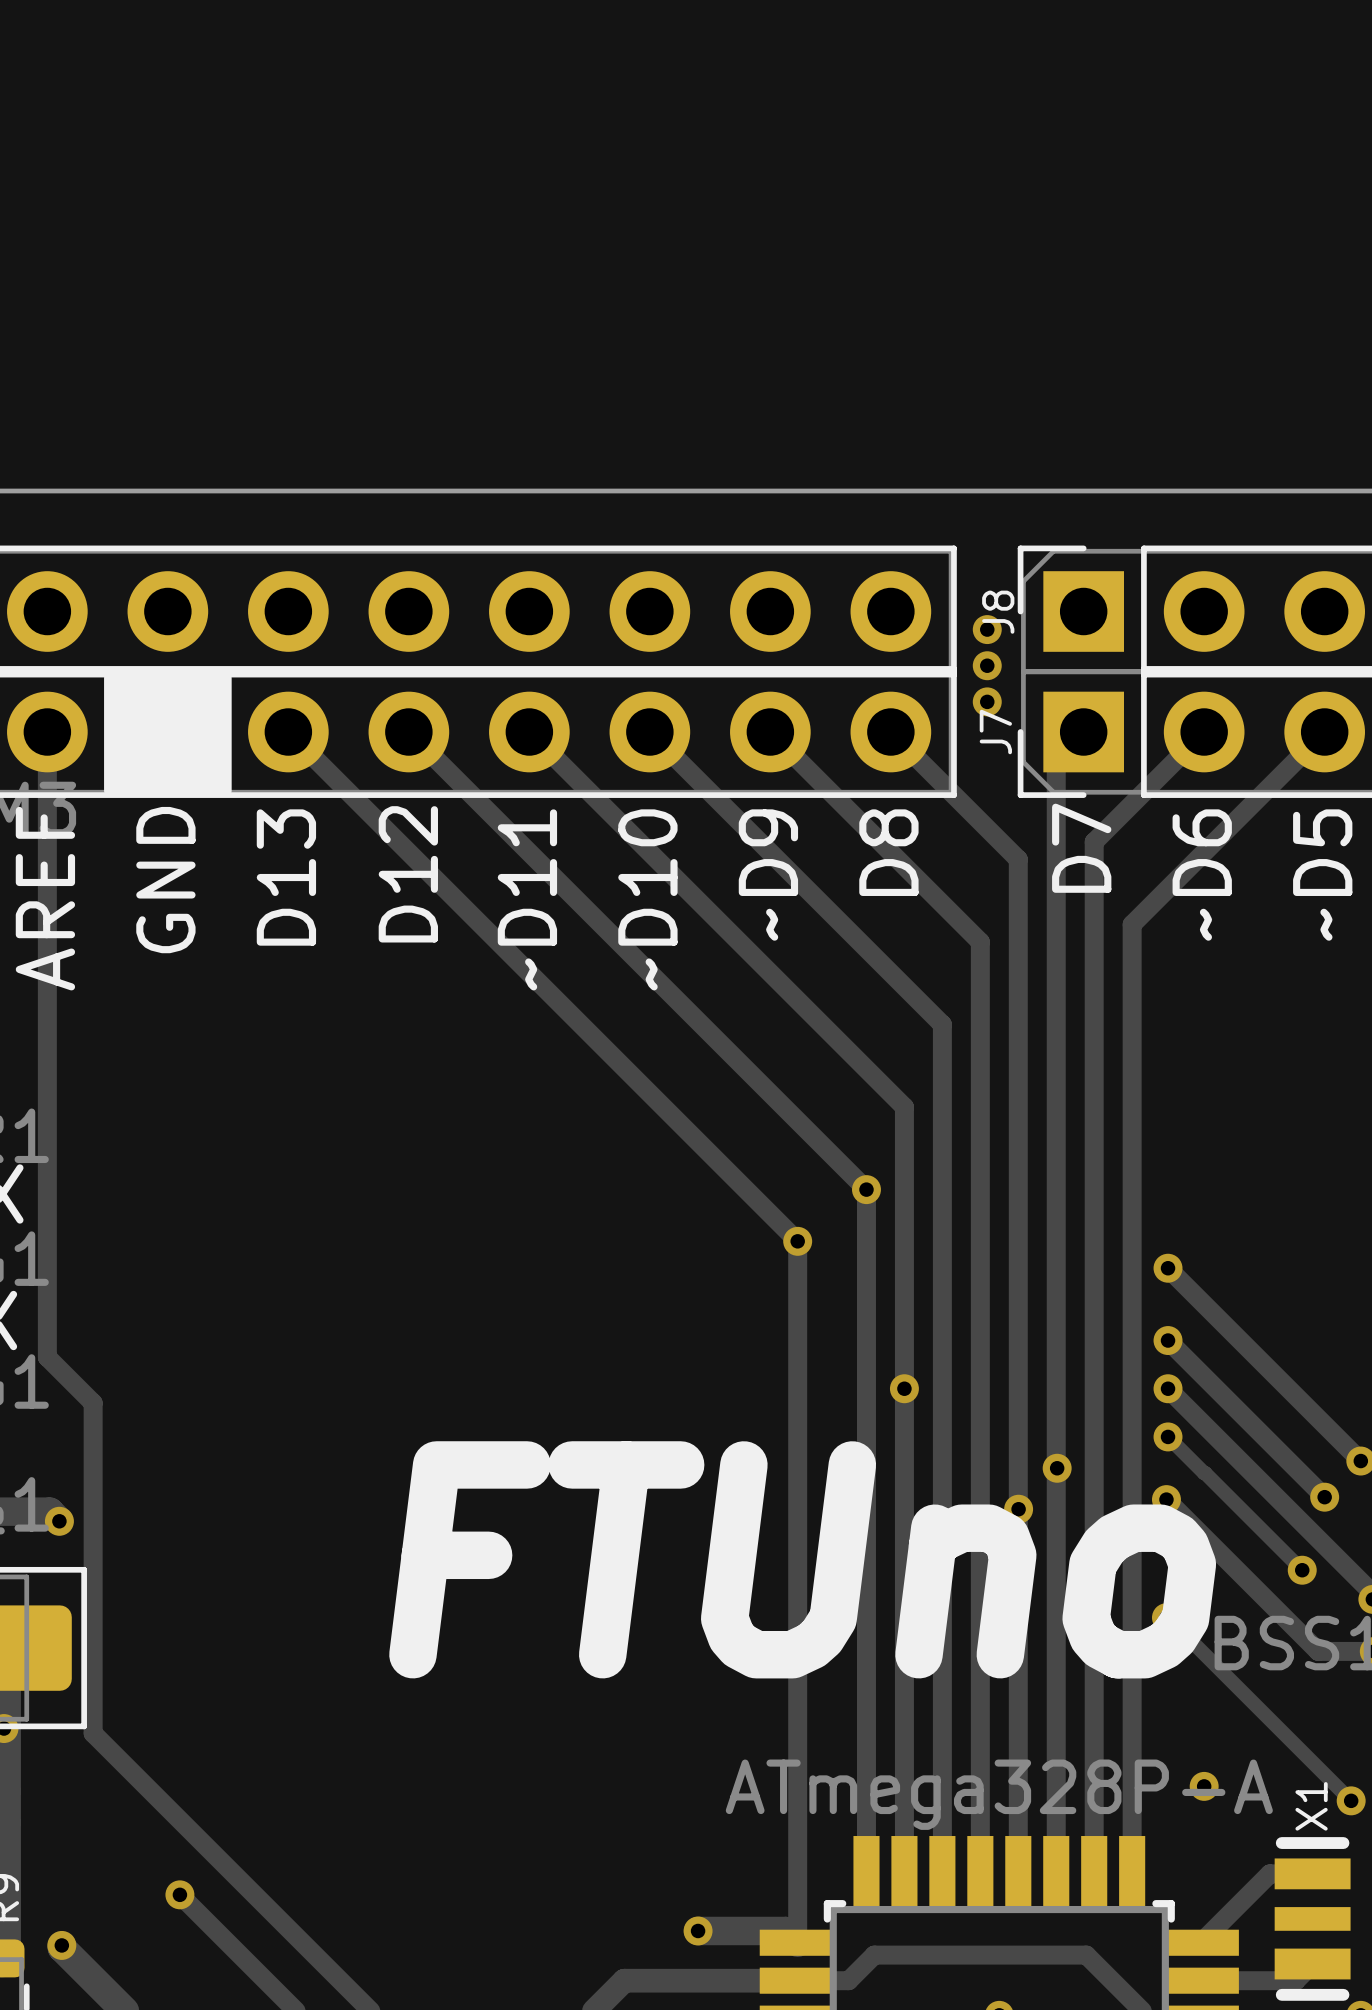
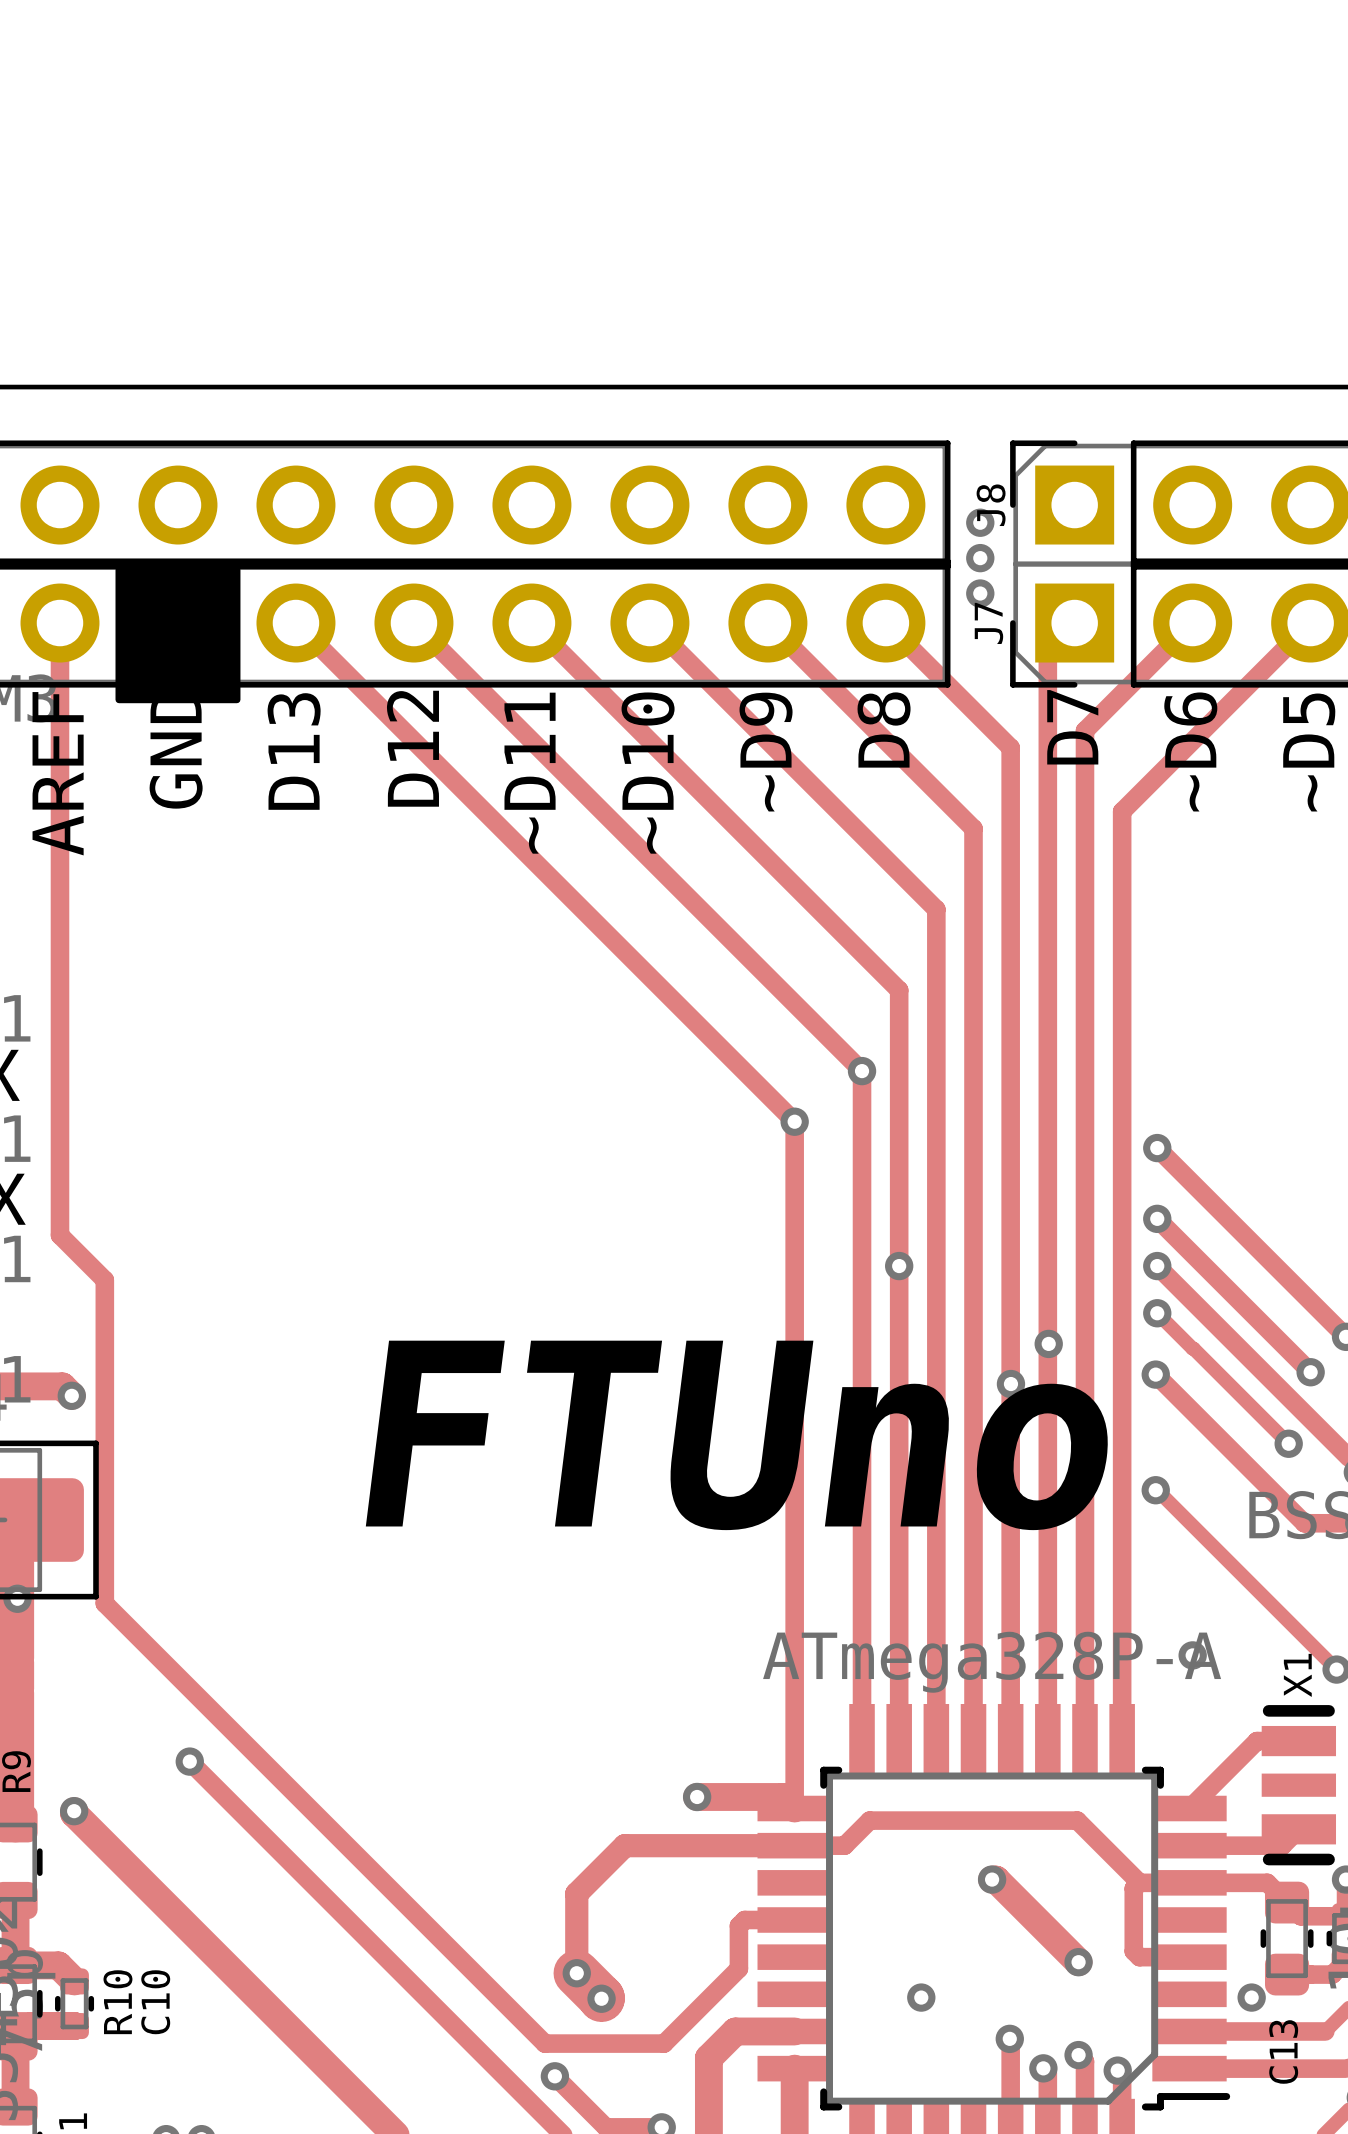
drawing shape: [104, 674, 232, 795] -> [115, 566, 241, 704]

